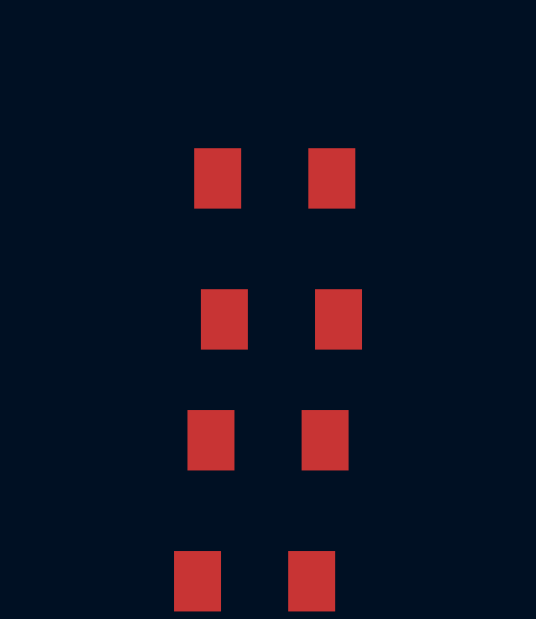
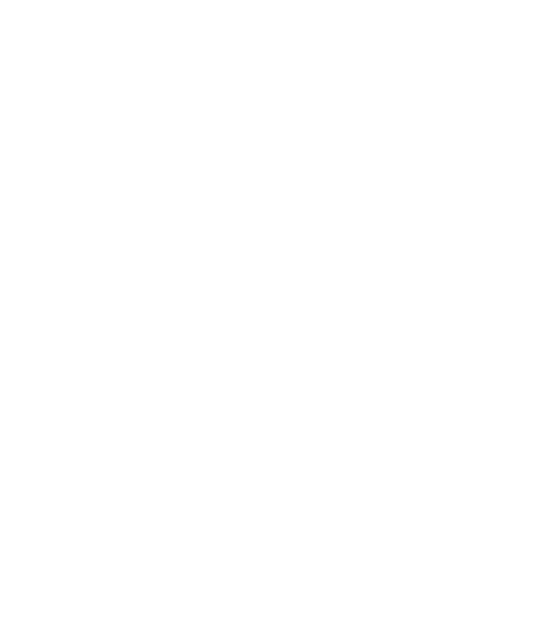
part: (274, 178) -> none
part: (281, 319) -> none
part: (268, 440) -> none
part: (254, 581) -> none

